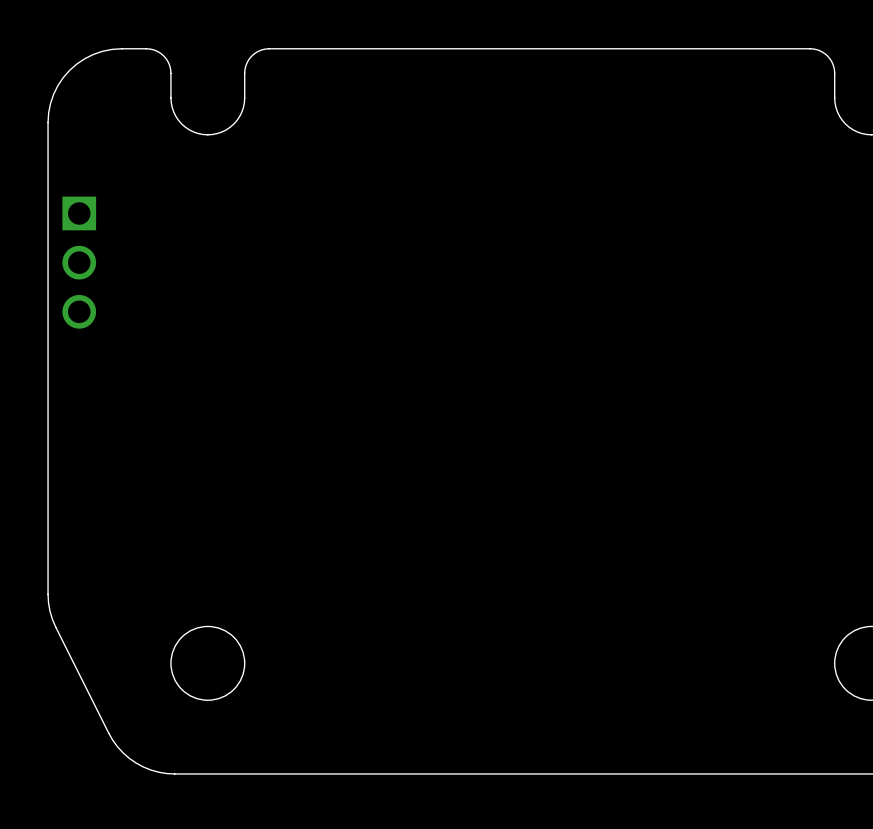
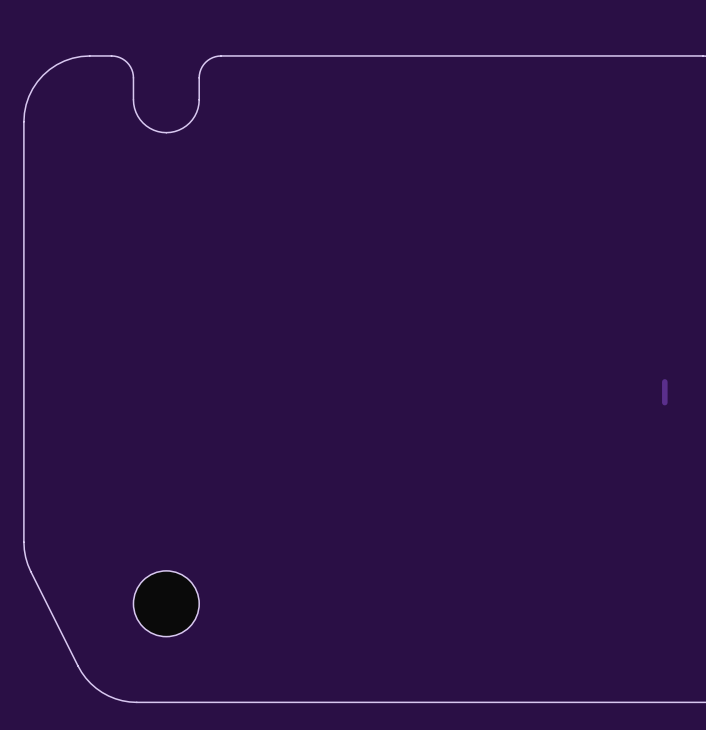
part: (79, 262) -> none
track: none -> (664, 381) (664, 402)

